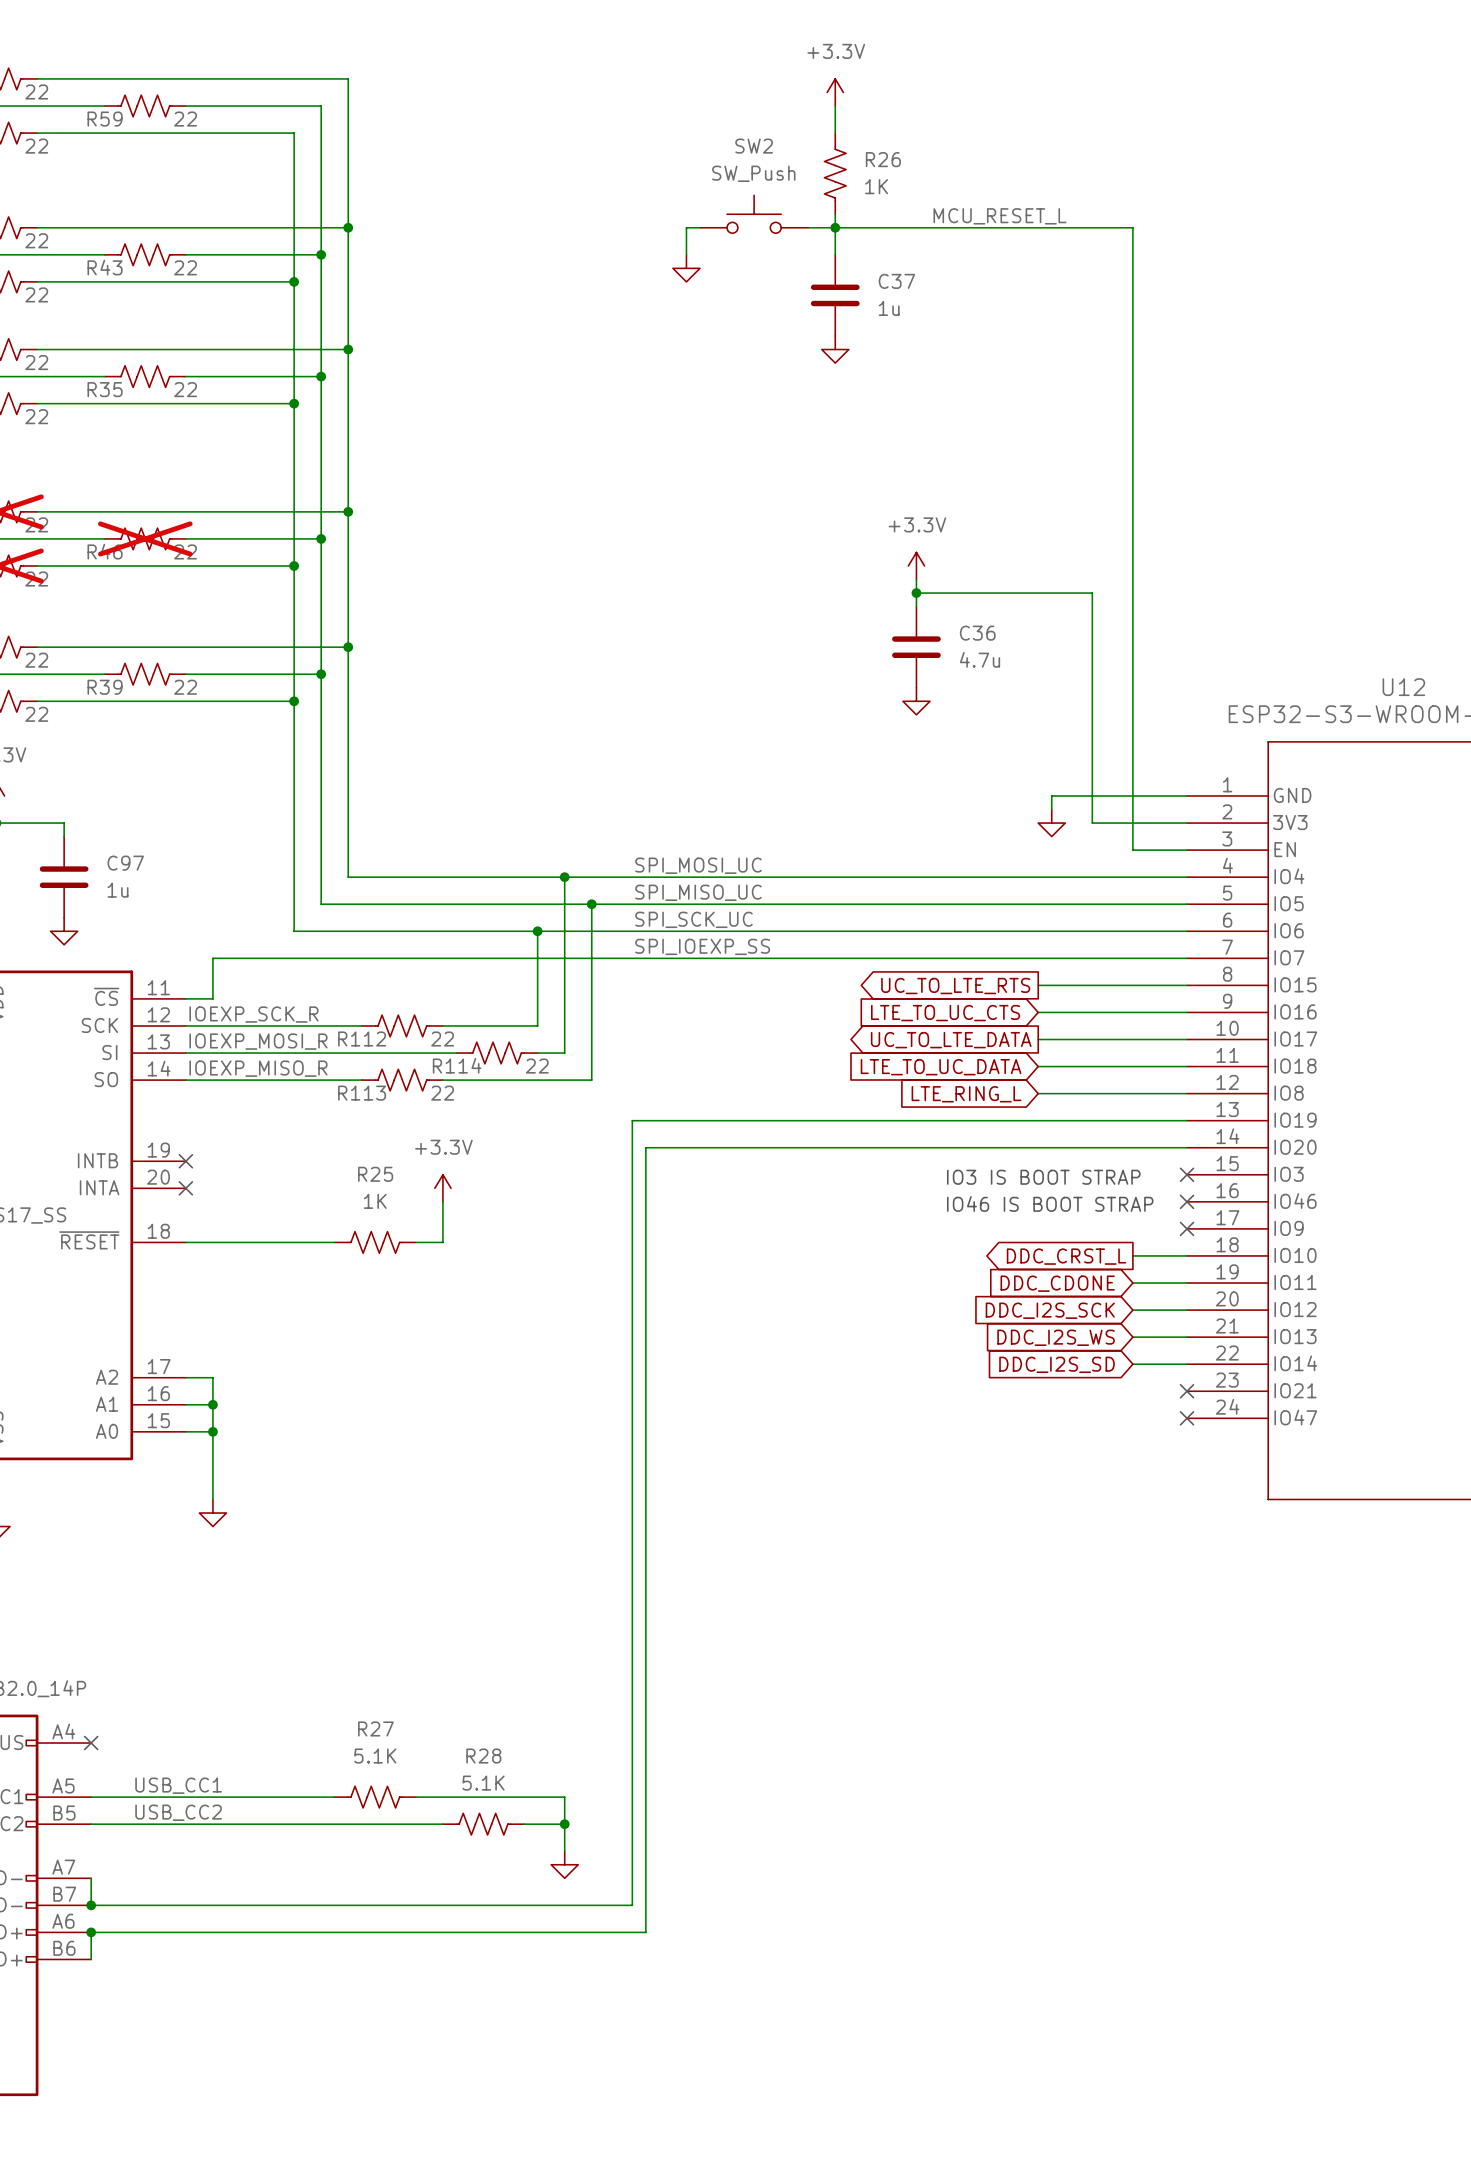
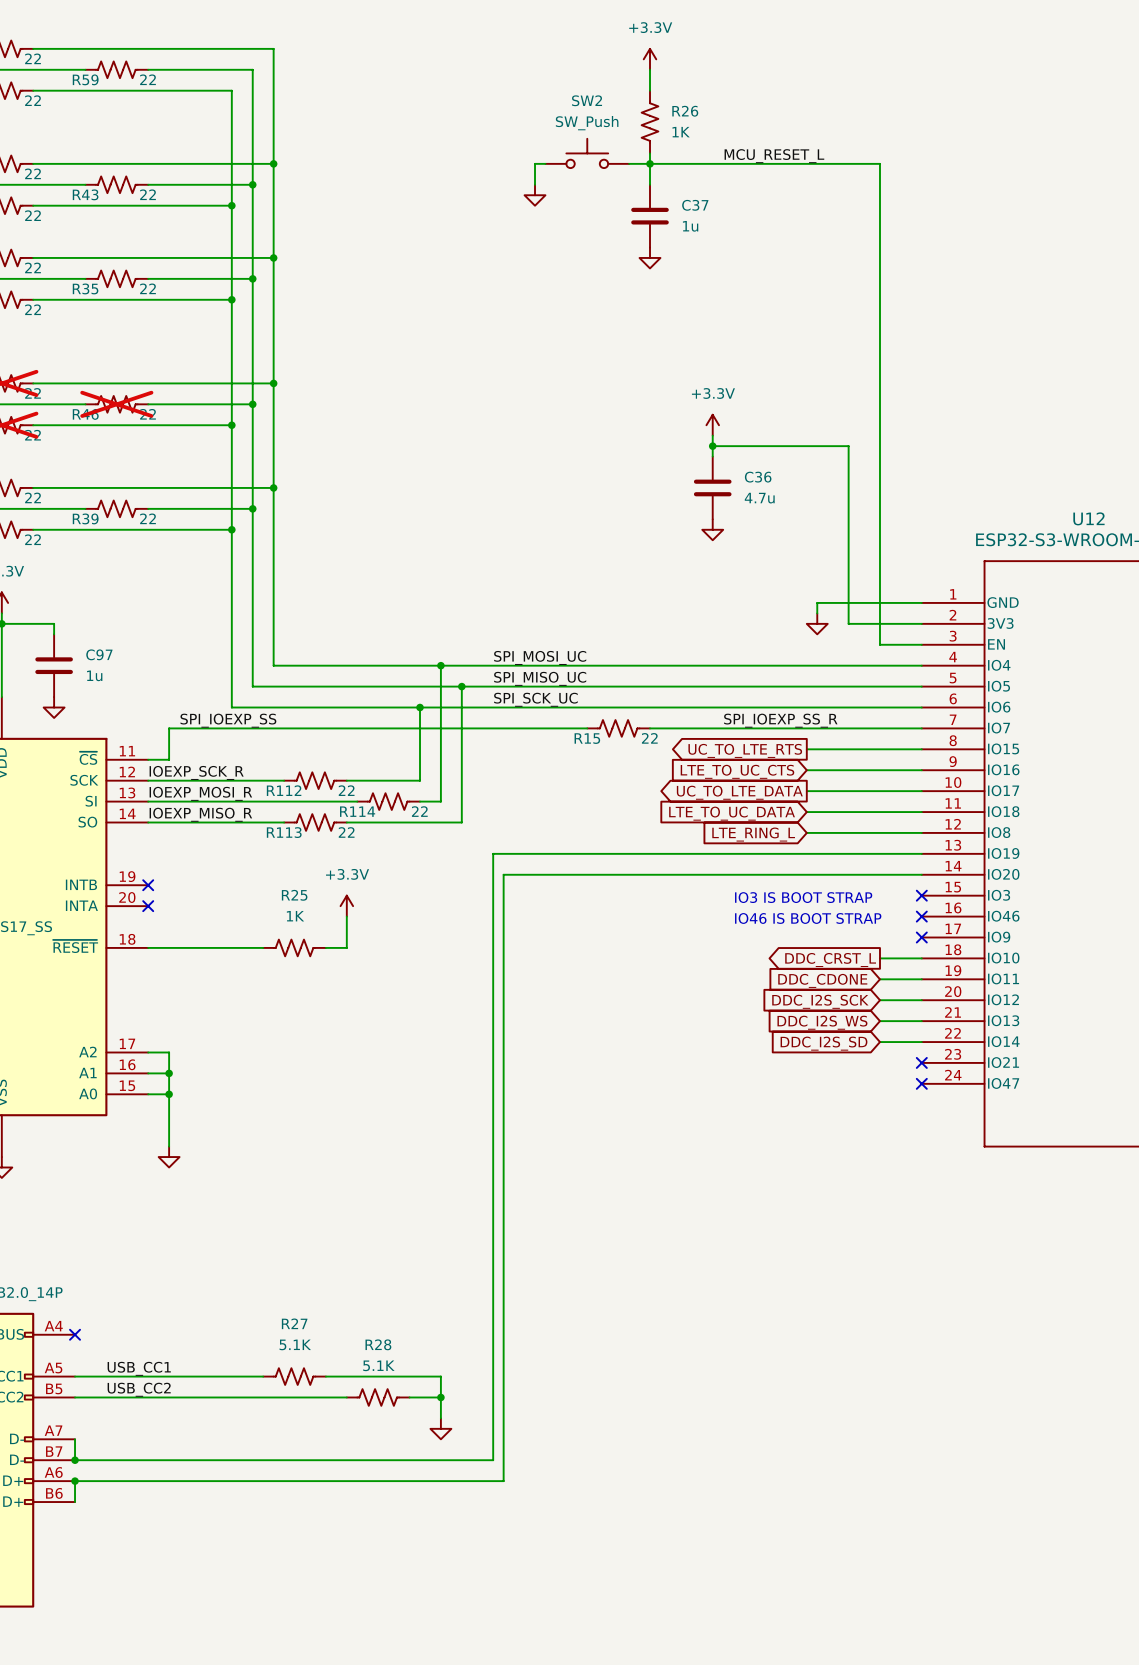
label: none -> SPI_IOEXP_SS (228, 720)
label: SPI_IOEXP_SS (702, 946) -> none
label: none -> SPI_IOEXP_SS_R (780, 720)
R15: none -> 22 (618, 728)

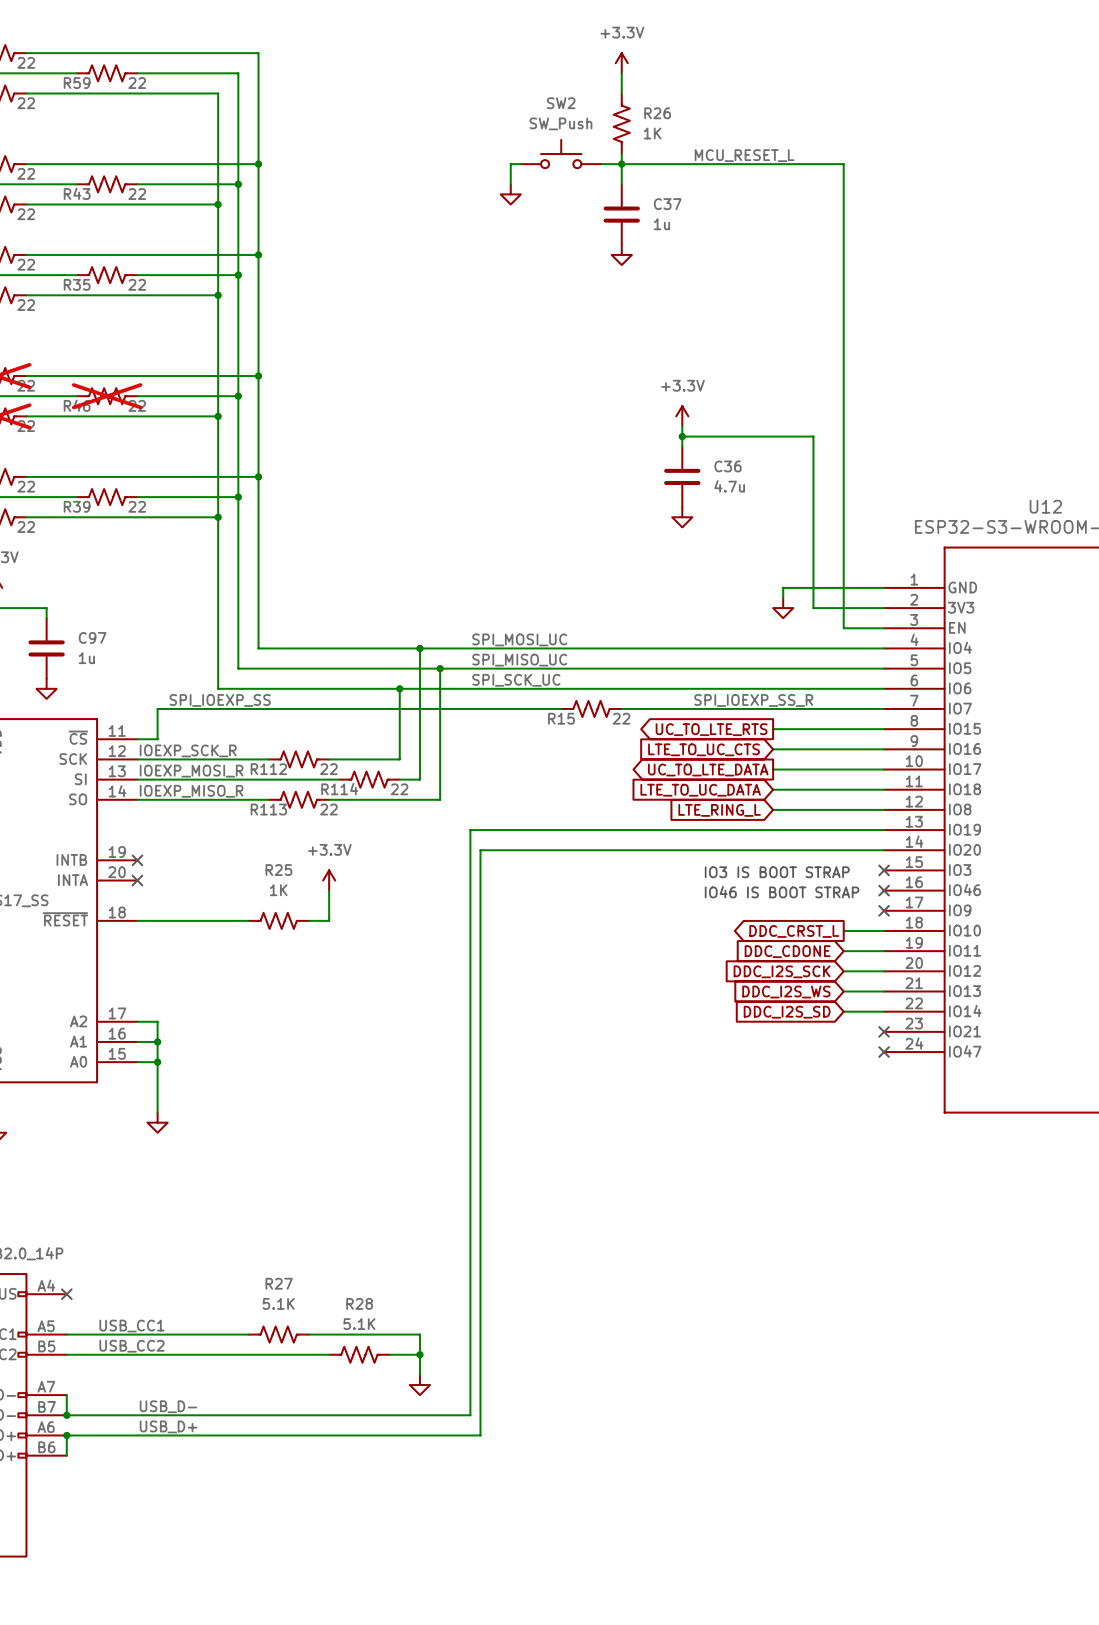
label: none -> USB_D- (168, 1406)
label: none -> USB_D+ (168, 1426)

